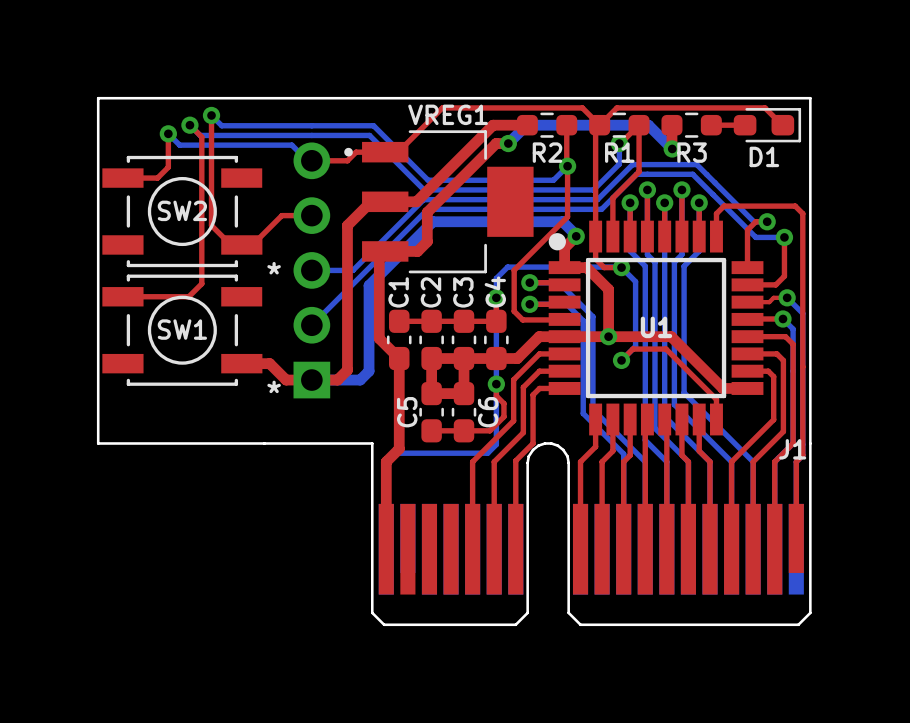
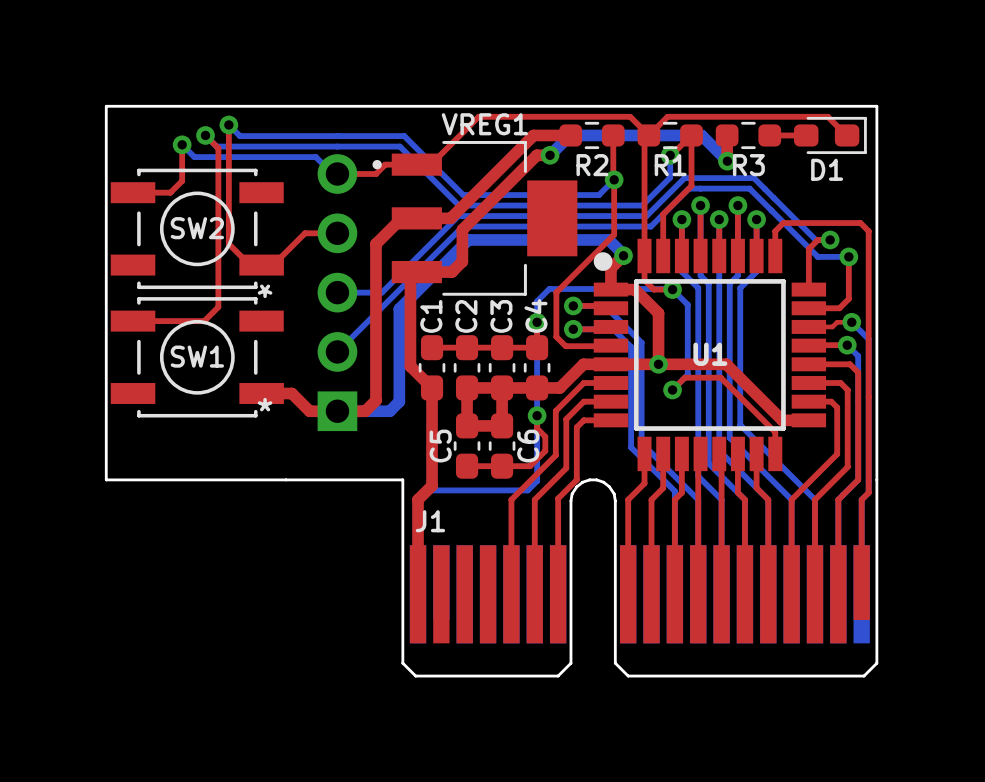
SW2 text rotation: 0° (274, 268) -> 180° (265, 291)
SW1 text position: * (274, 386) -> * (265, 404)
J1 name position: J1 (792, 449) -> J1 (430, 521)

